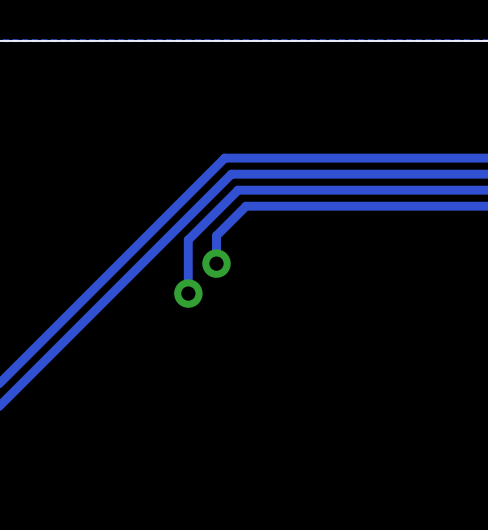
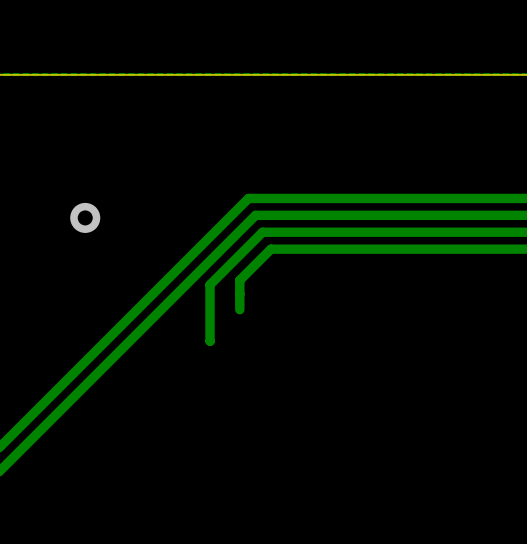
via: none -> (85, 217)
via: (216, 263) -> none
via: (188, 293) -> none

